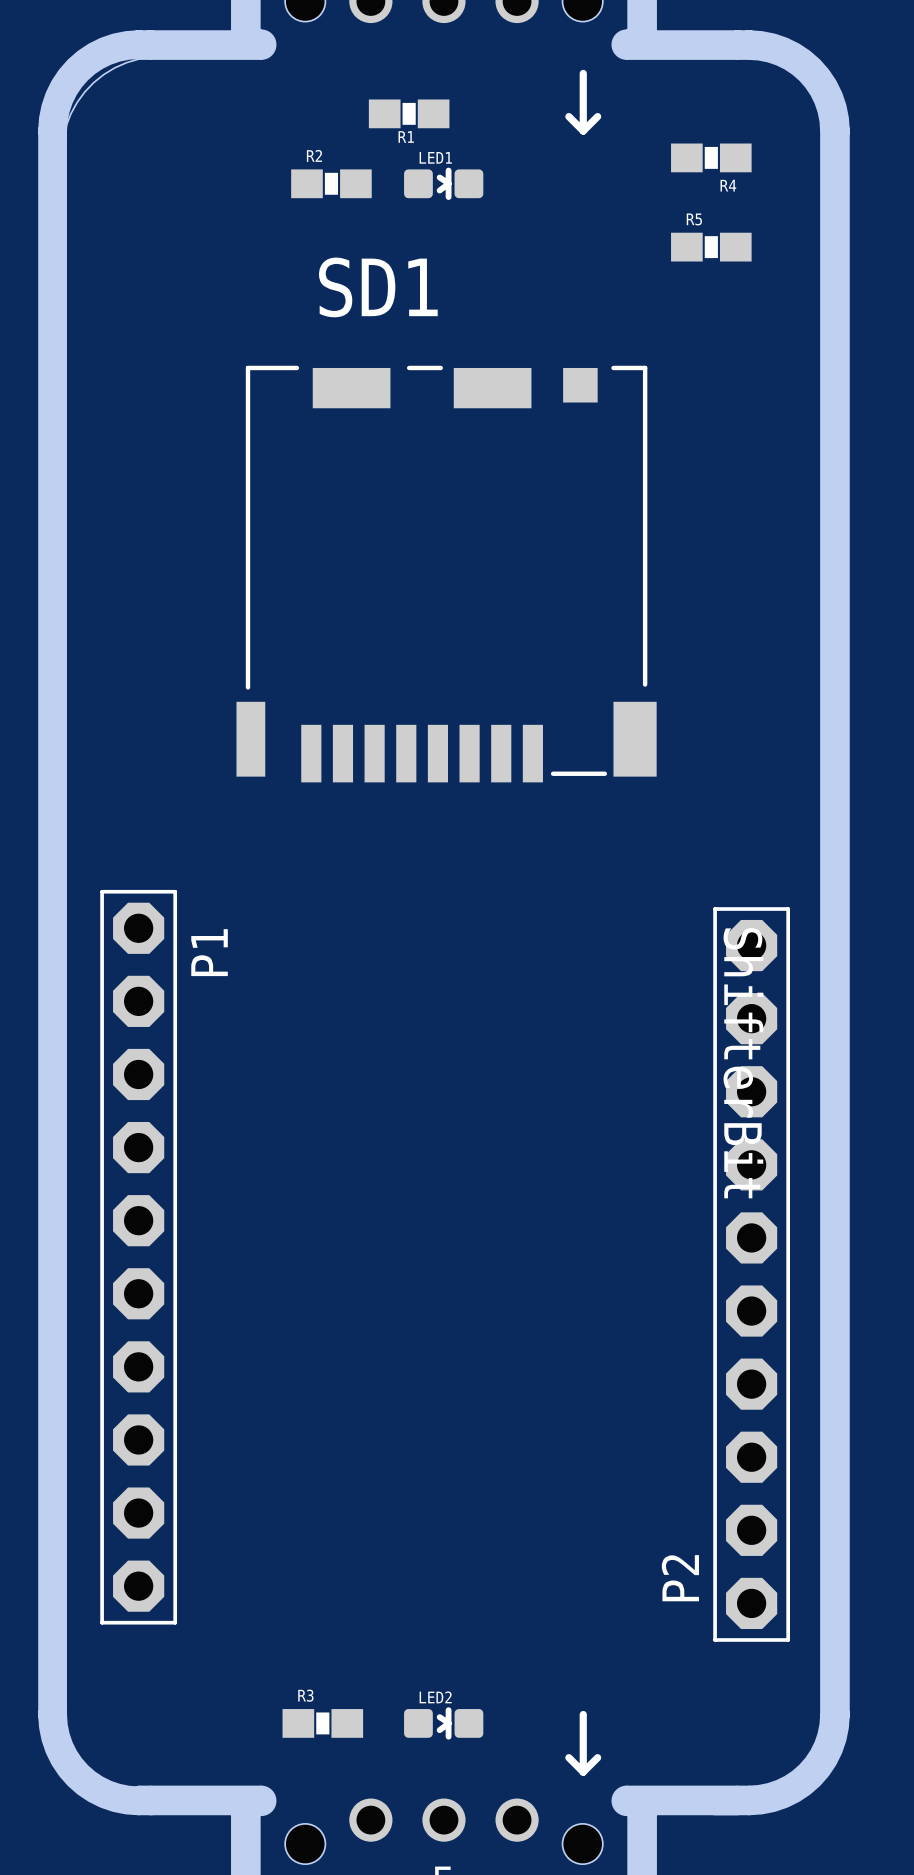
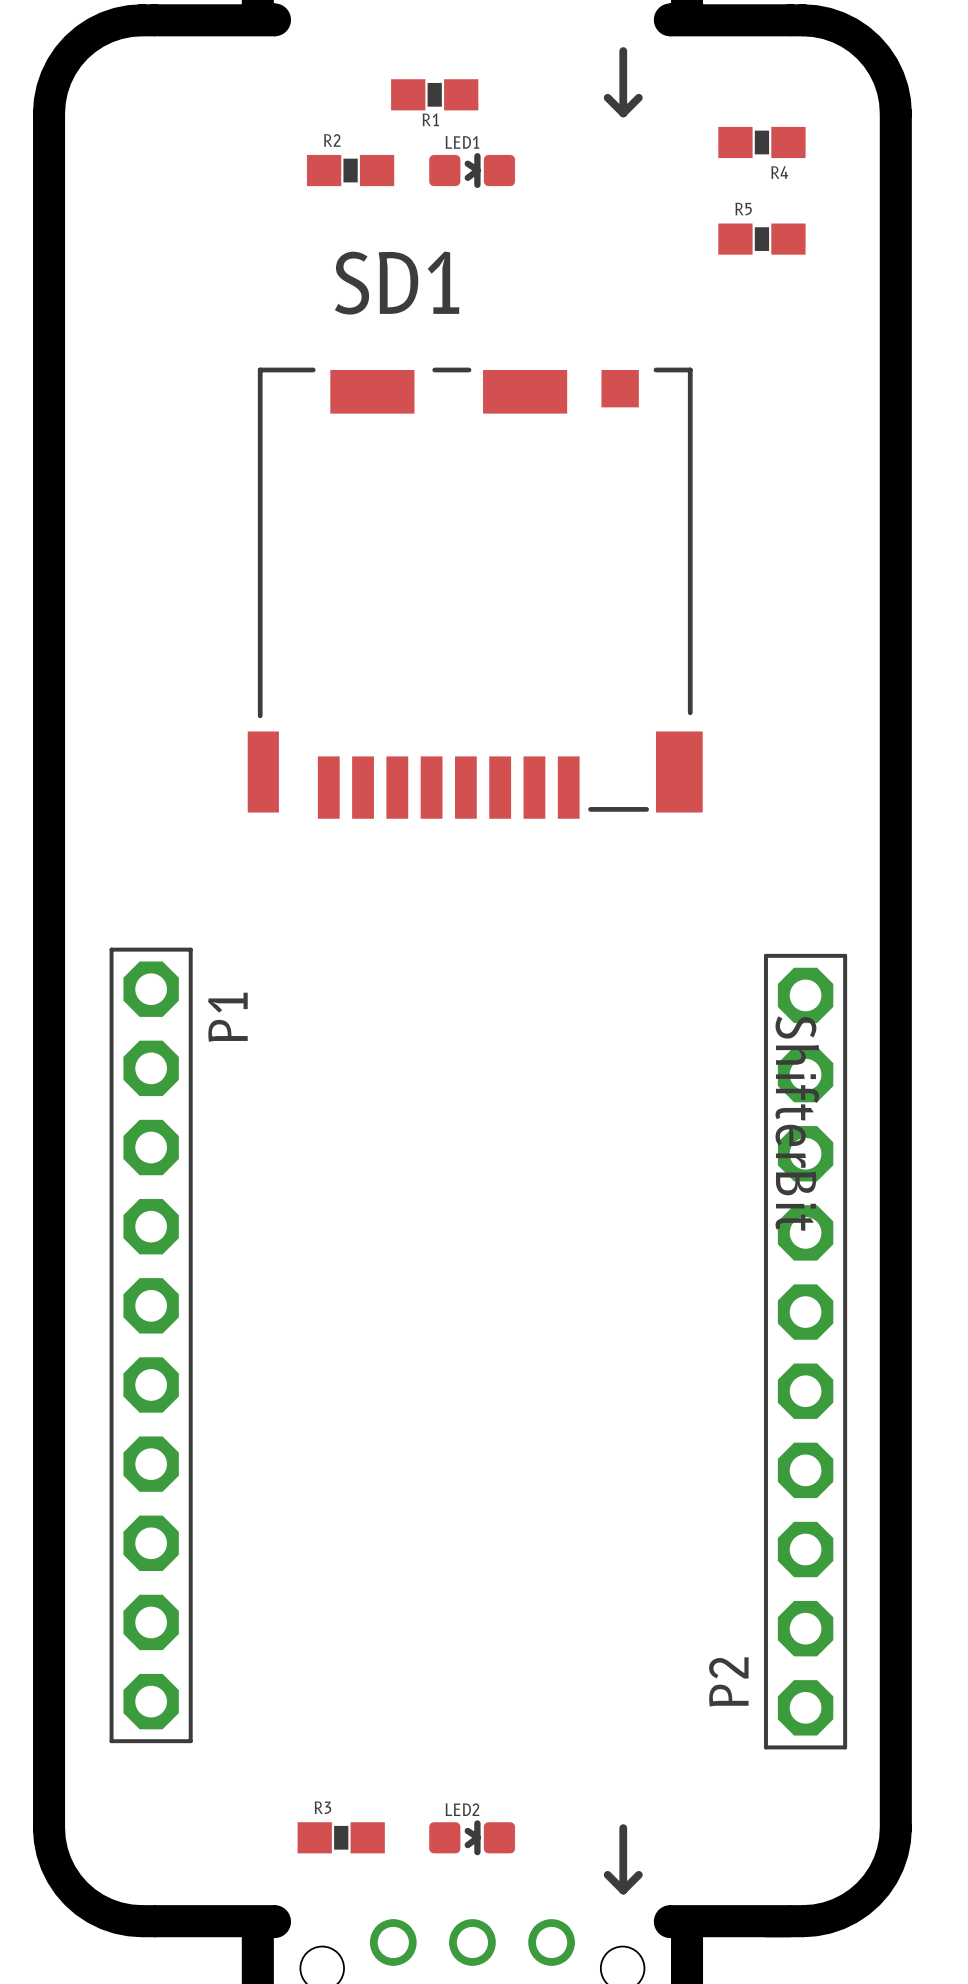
board edge: (138, 59) (114, 67) (103, 74) (84, 92) (70, 113) (66, 125) (61, 151) (64, 177) (64, 1760) (77, 1777) (96, 1789) (117, 1791) (138, 1786) -> (142, 35) (112, 41) (87, 58) (70, 83) (64, 113) (64, 1828) (70, 1857) (87, 1883) (112, 1900) (142, 1906)
P1 position: (138, 1257) -> (151, 1345)

